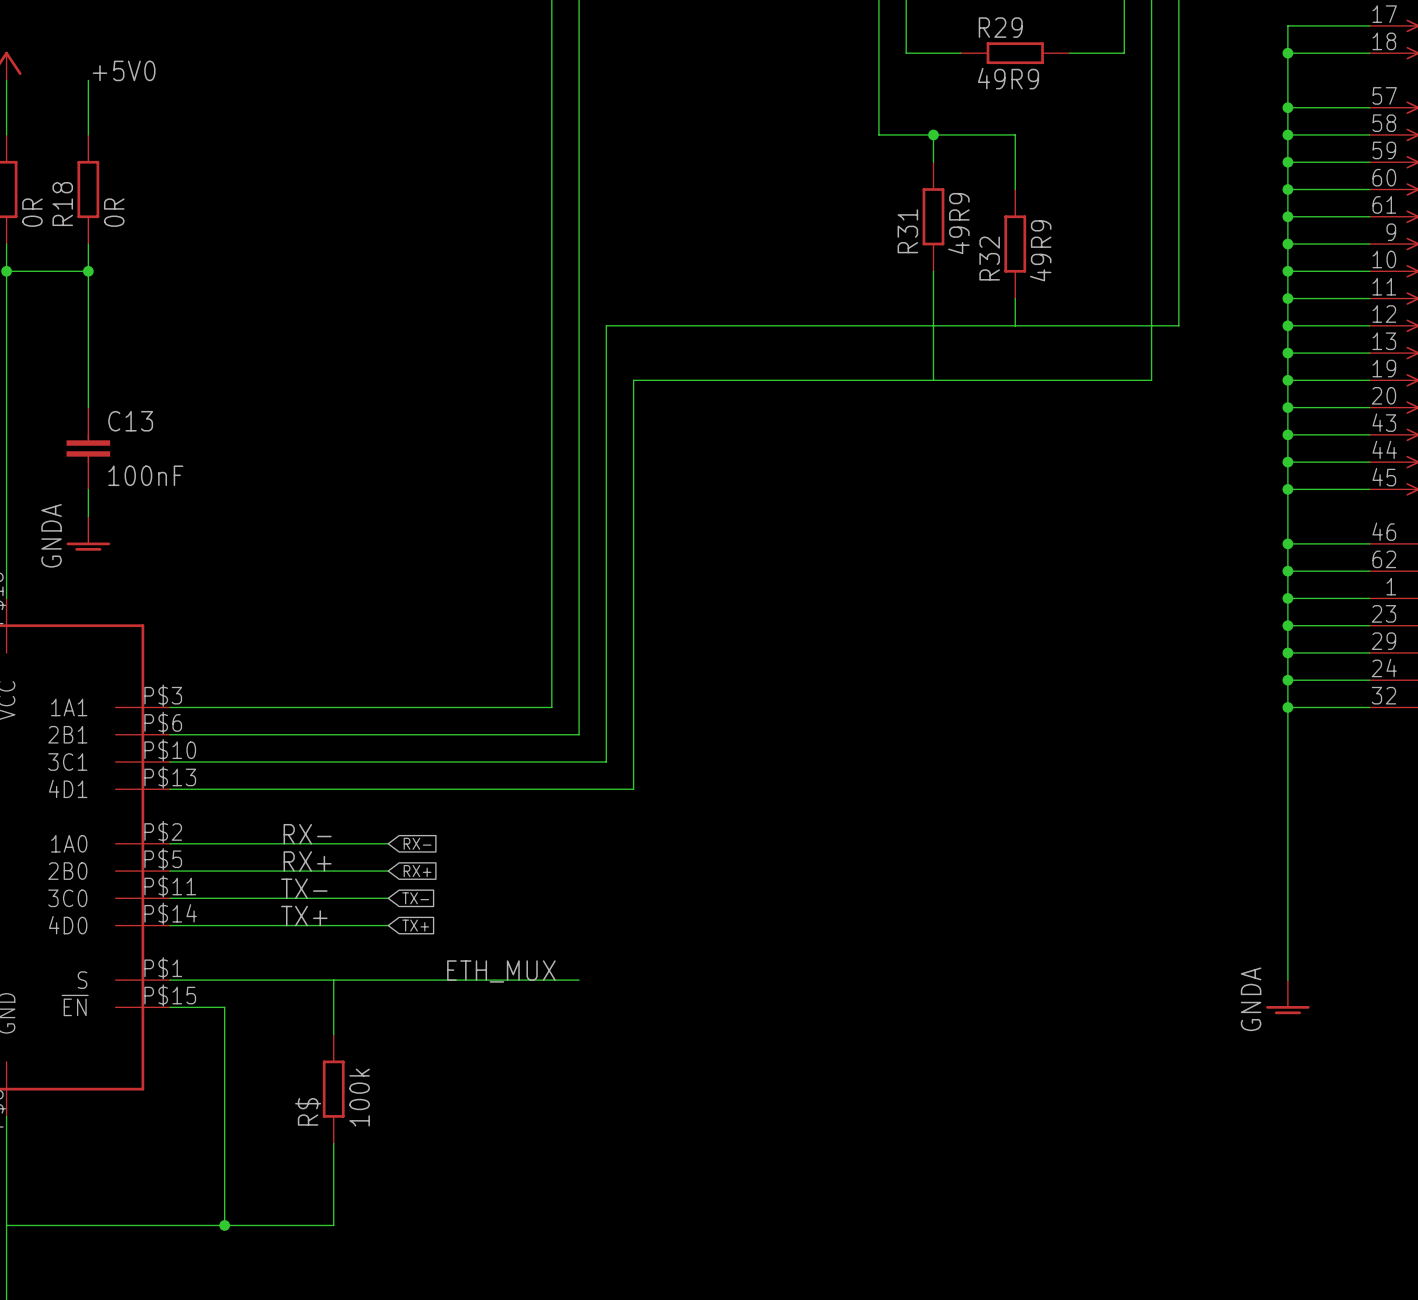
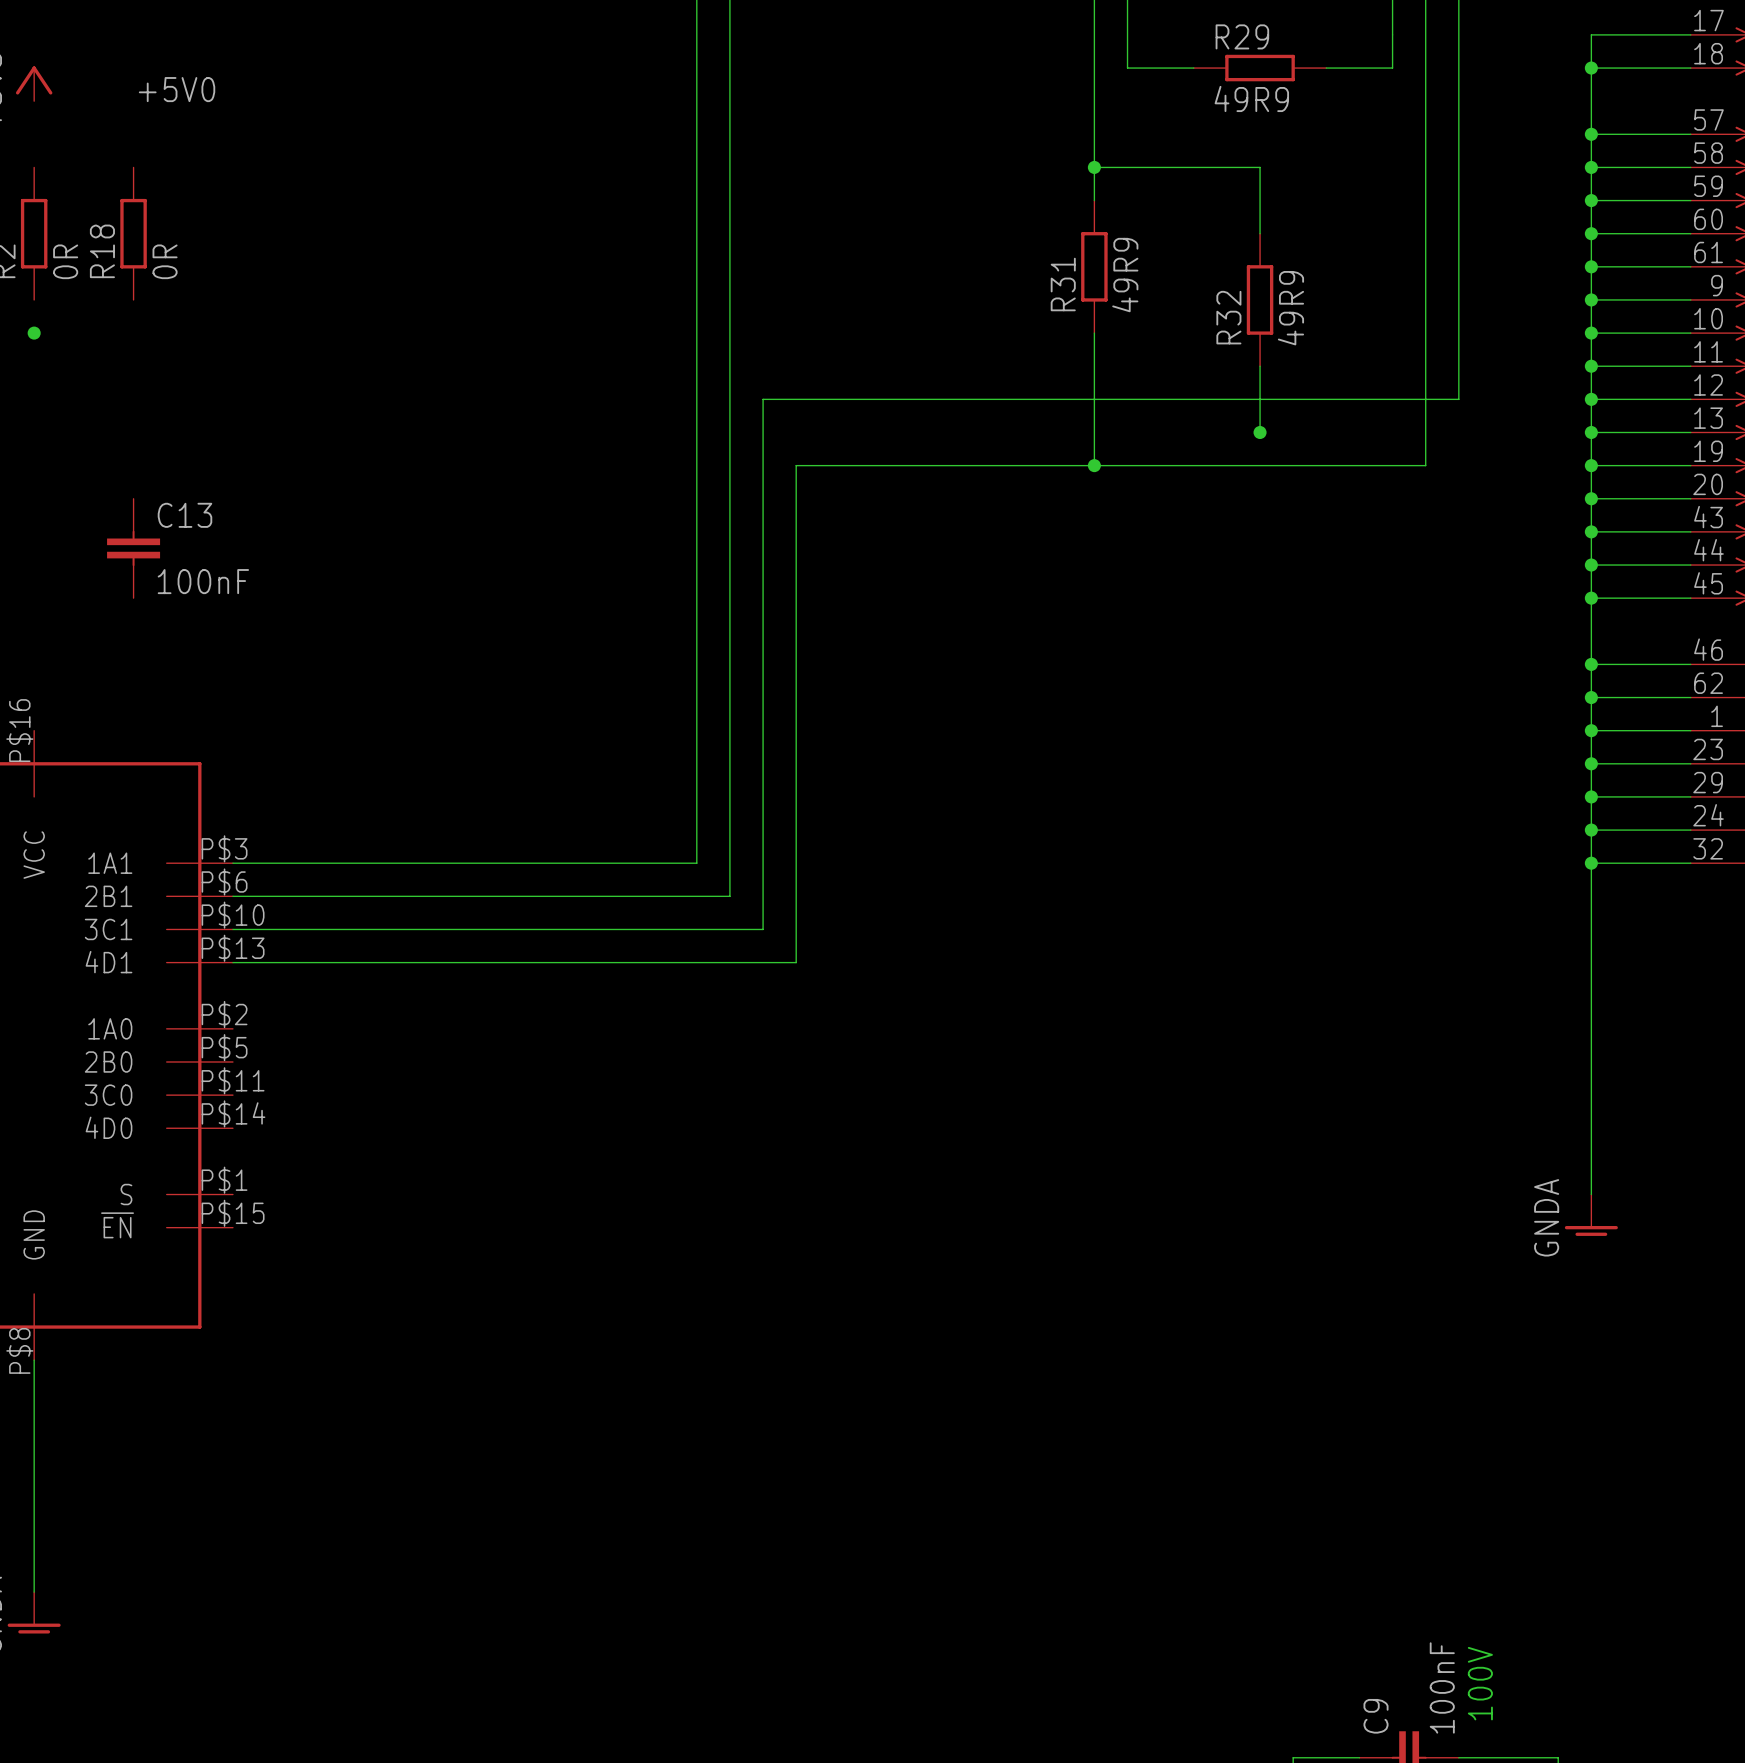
wire: (6, 80) (6, 134) -> none
wire: (88, 80) (88, 134) -> none
wire: (933, 134) (933, 162) -> (1094, 167) (1094, 200)
junction position: (933, 134) -> (1094, 167)
R31 position: (933, 216) -> (1094, 266)
wire: (6, 244) (6, 598) -> none
wire: (88, 244) (88, 407) -> none
wire: (6, 271) (88, 271) -> none
junction: (88, 271) -> none
wire: (933, 271) (933, 380) -> (1094, 333) (1094, 465)
wire: none -> (1260, 399) (1260, 432)
junction: none -> (1260, 432)
junction: none -> (1094, 465)
wire: (88, 489) (88, 516) -> none
power symbol: GNDA (88, 533) -> none
label: RX- (307, 834) -> none
wire: (170, 843) (388, 843) -> none
global label: RX- (417, 843) -> none
label: RX+ (307, 861) -> none
wire: (170, 871) (388, 871) -> none
global label: RX+ (417, 871) -> none
label: TX- (304, 888) -> none
wire: (170, 898) (388, 898) -> none
global label: TX- (415, 898) -> none
label: TX+ (304, 916) -> none
wire: (170, 925) (388, 925) -> none
global label: TX+ (415, 925) -> none
label: ETH_MUX (501, 971) -> none
wire: (170, 980) (579, 980) -> none
wire: (333, 980) (333, 1034) -> none
wire: (170, 1007) (224, 1007) (224, 1225) -> none
R$: 100k (333, 1089) -> none
wire: (333, 1143) (333, 1225) (6, 1225) -> none
junction: (224, 1225) -> none

